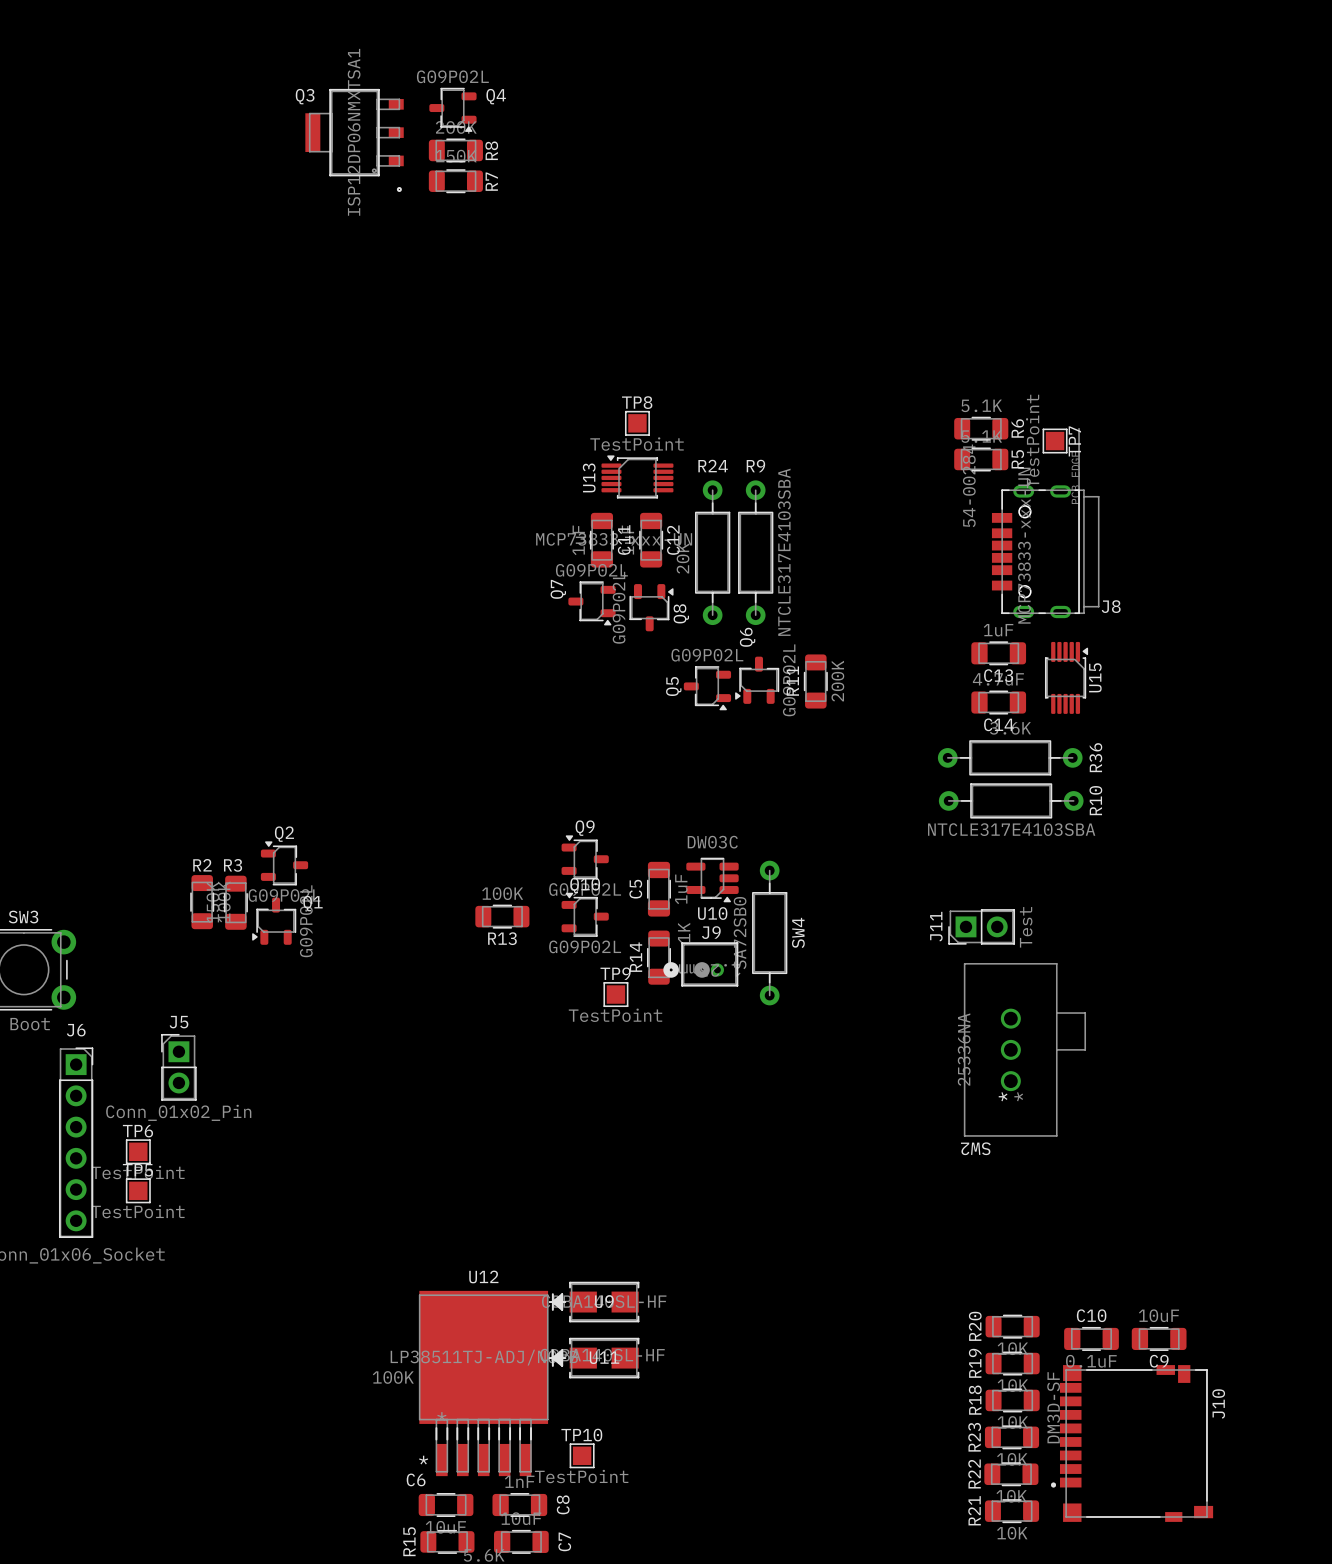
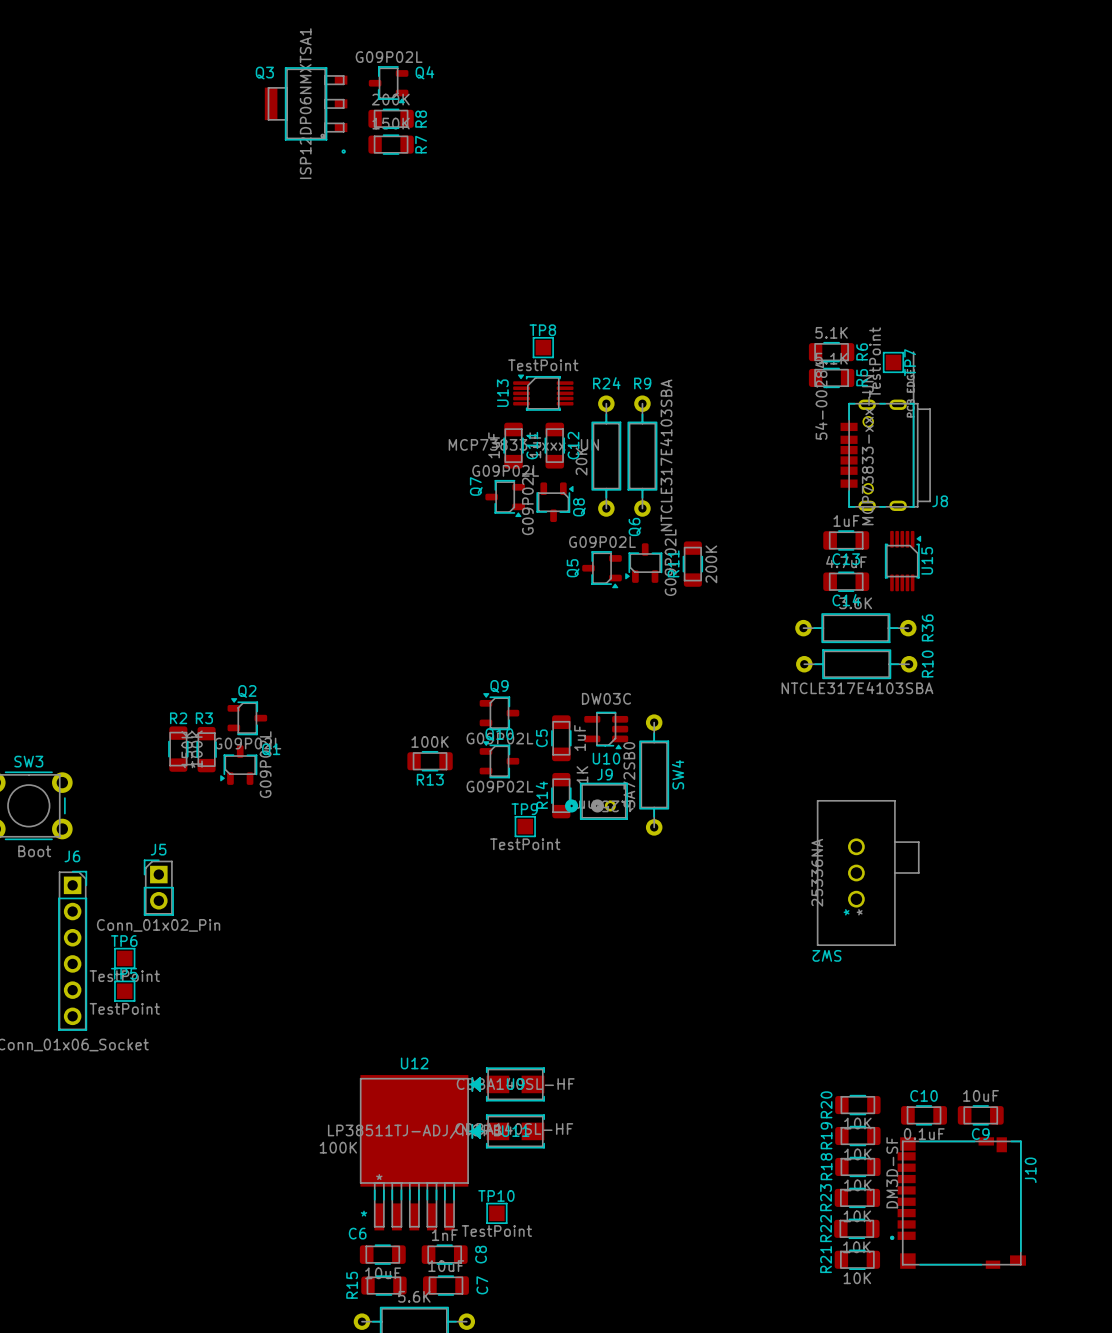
J11: Test (981, 926) -> none

